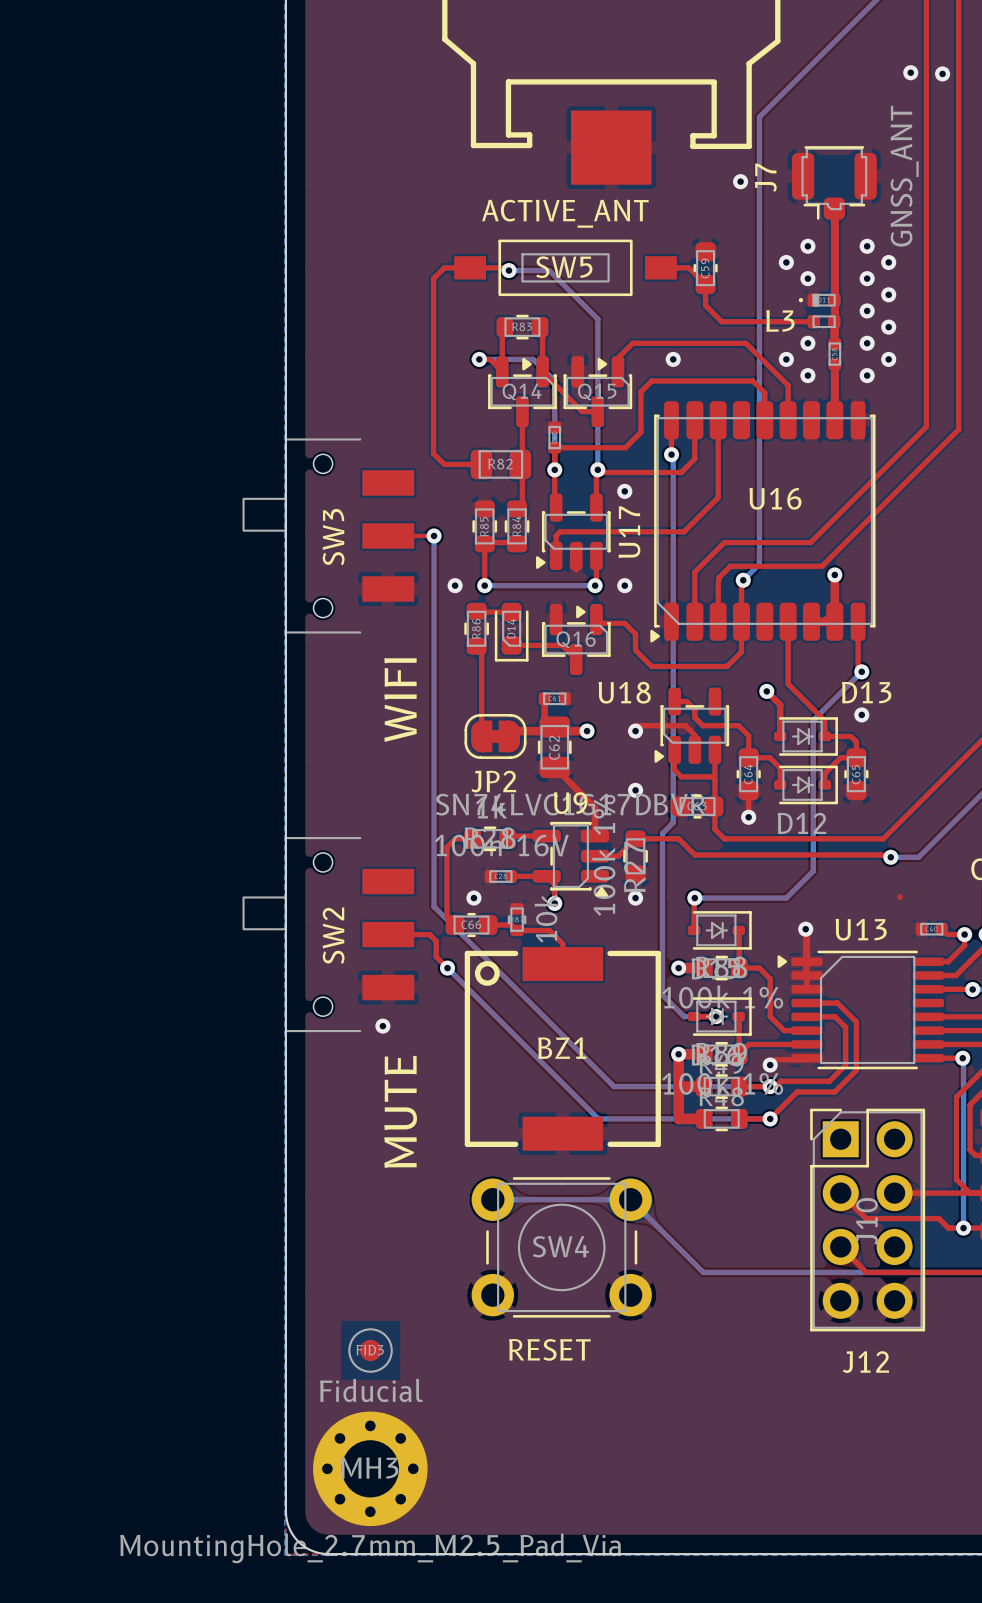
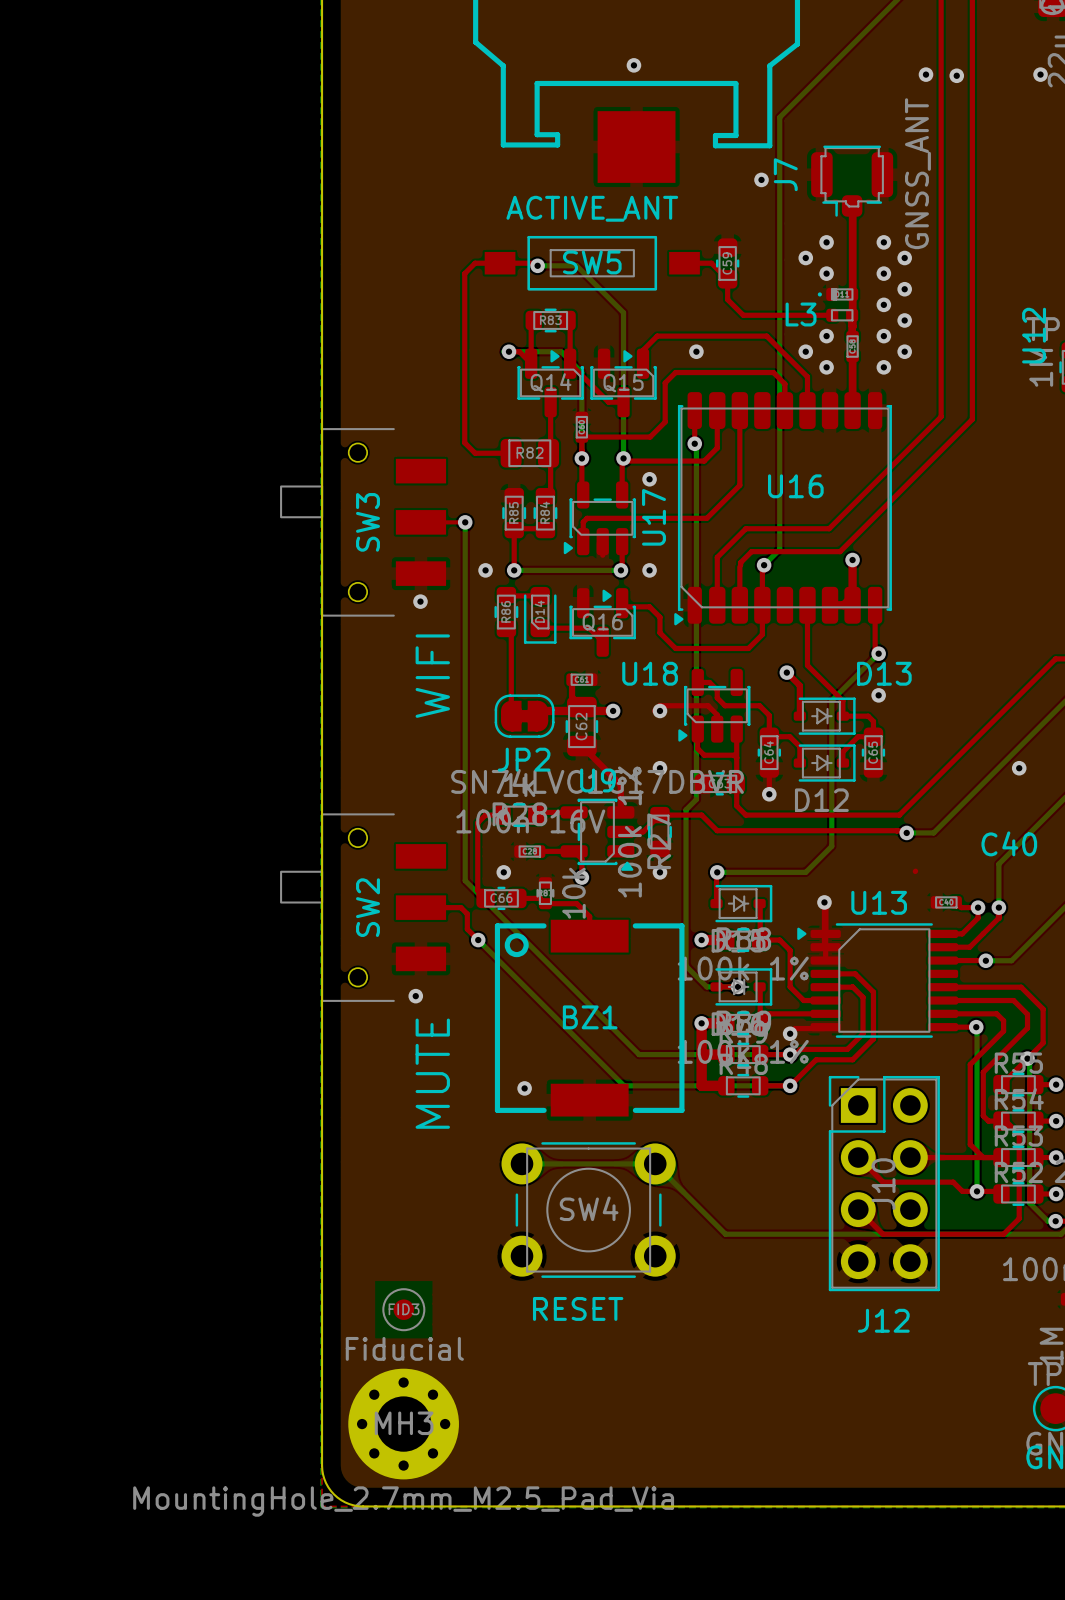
via: none -> (633, 65)
via: none -> (420, 601)
via: none -> (524, 1088)

